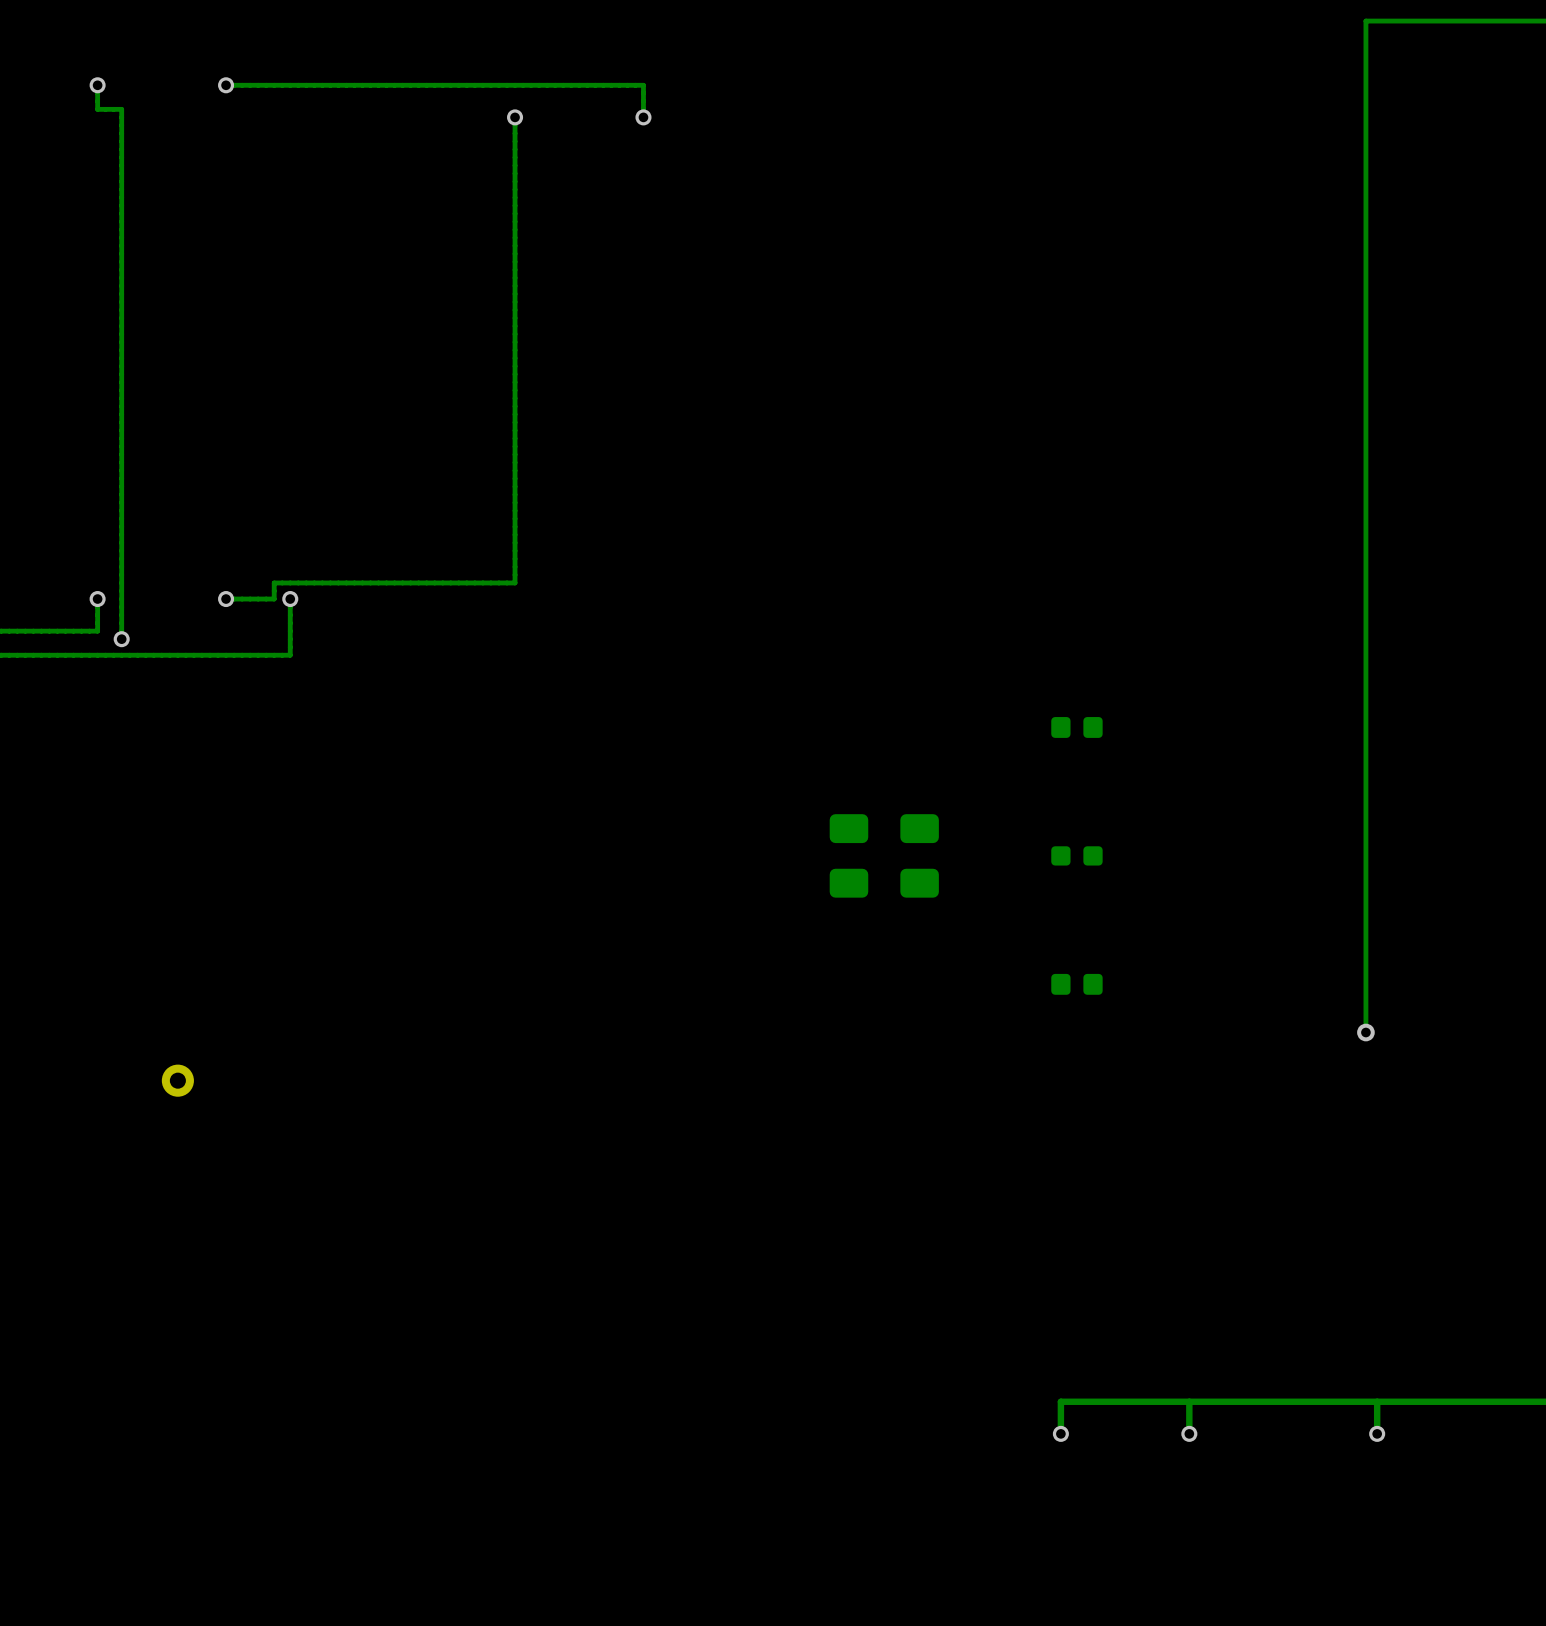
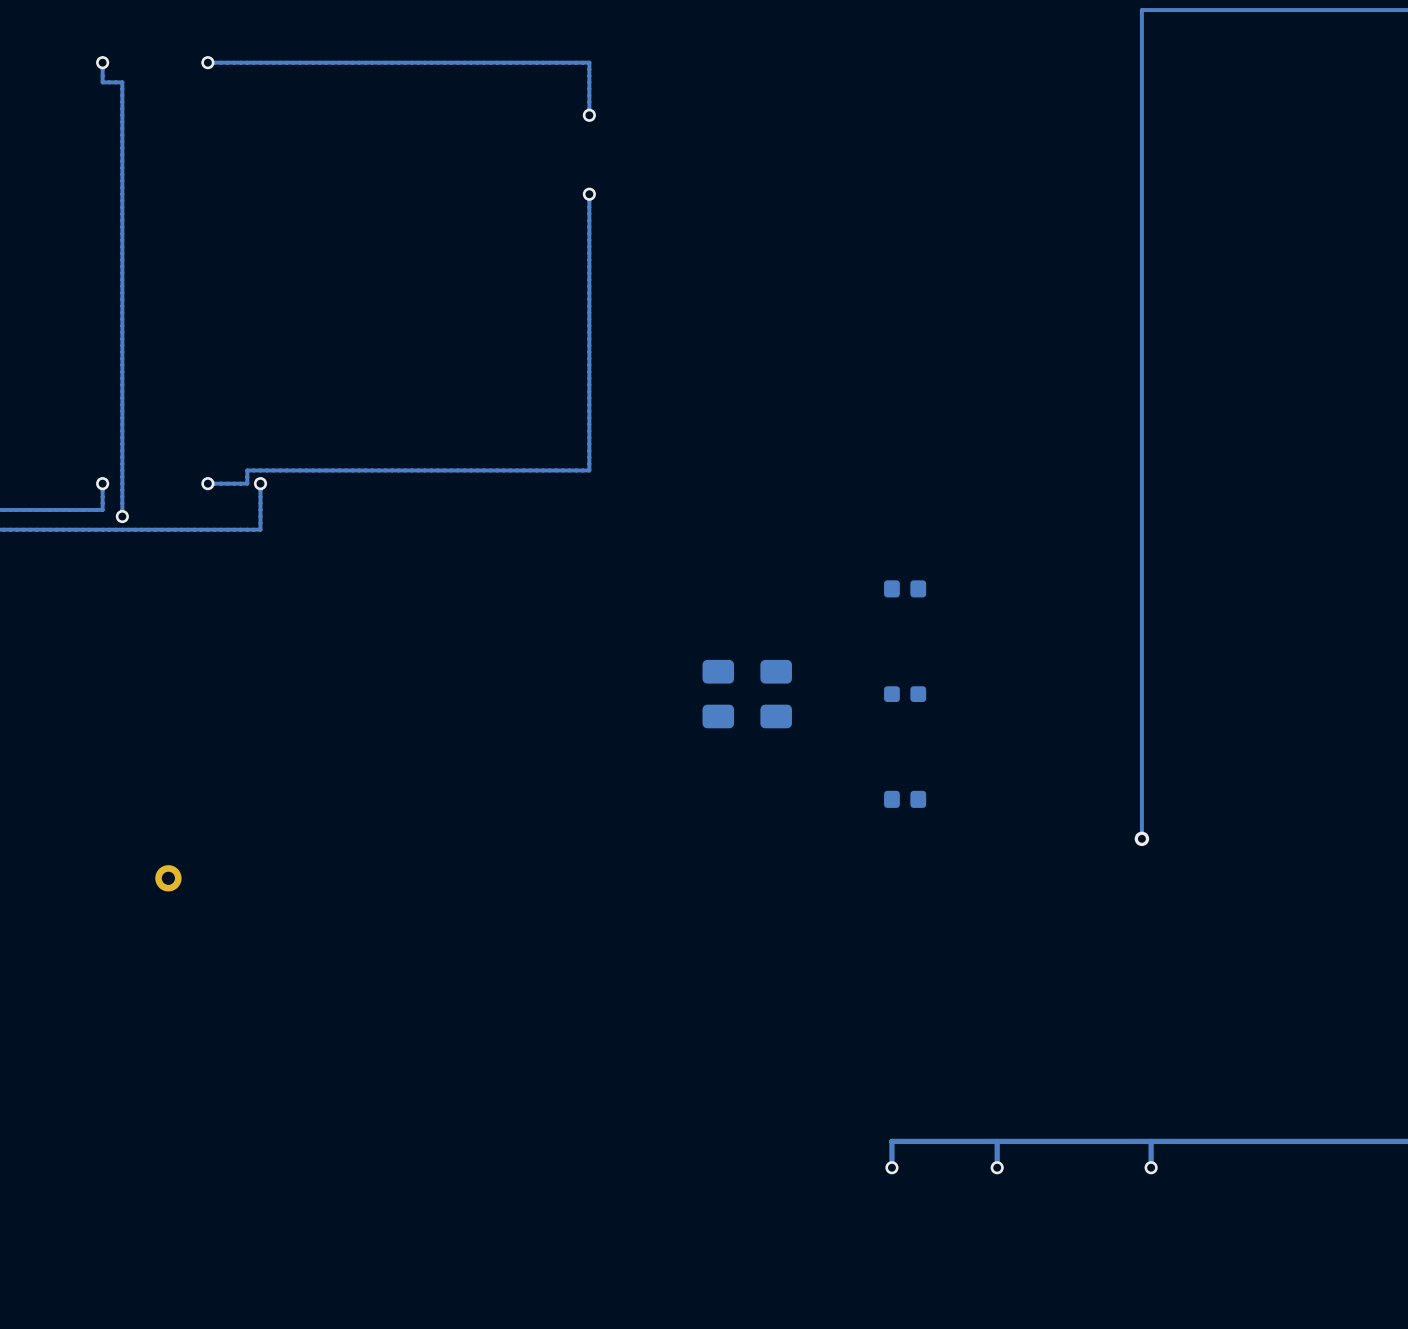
track: (643, 85) (643, 117) -> (549, 62) (589, 62) (589, 115)
track: (515, 117) (515, 582) -> (589, 194) (589, 470) (444, 470)
via: (515, 117) -> none
via position: (643, 117) -> (589, 115)
via: none -> (589, 194)

